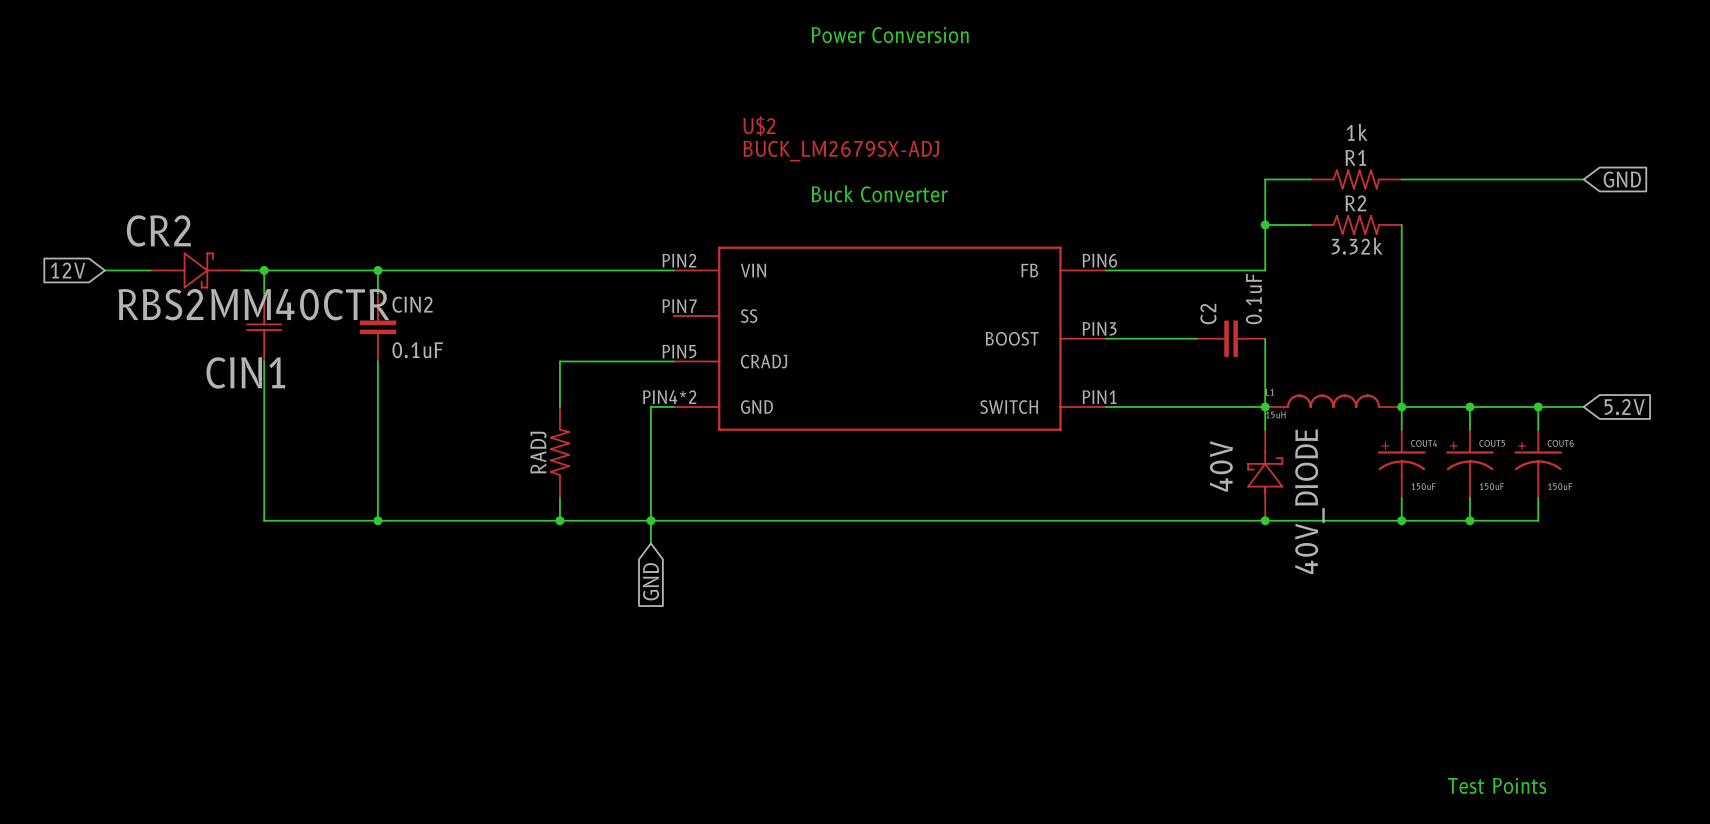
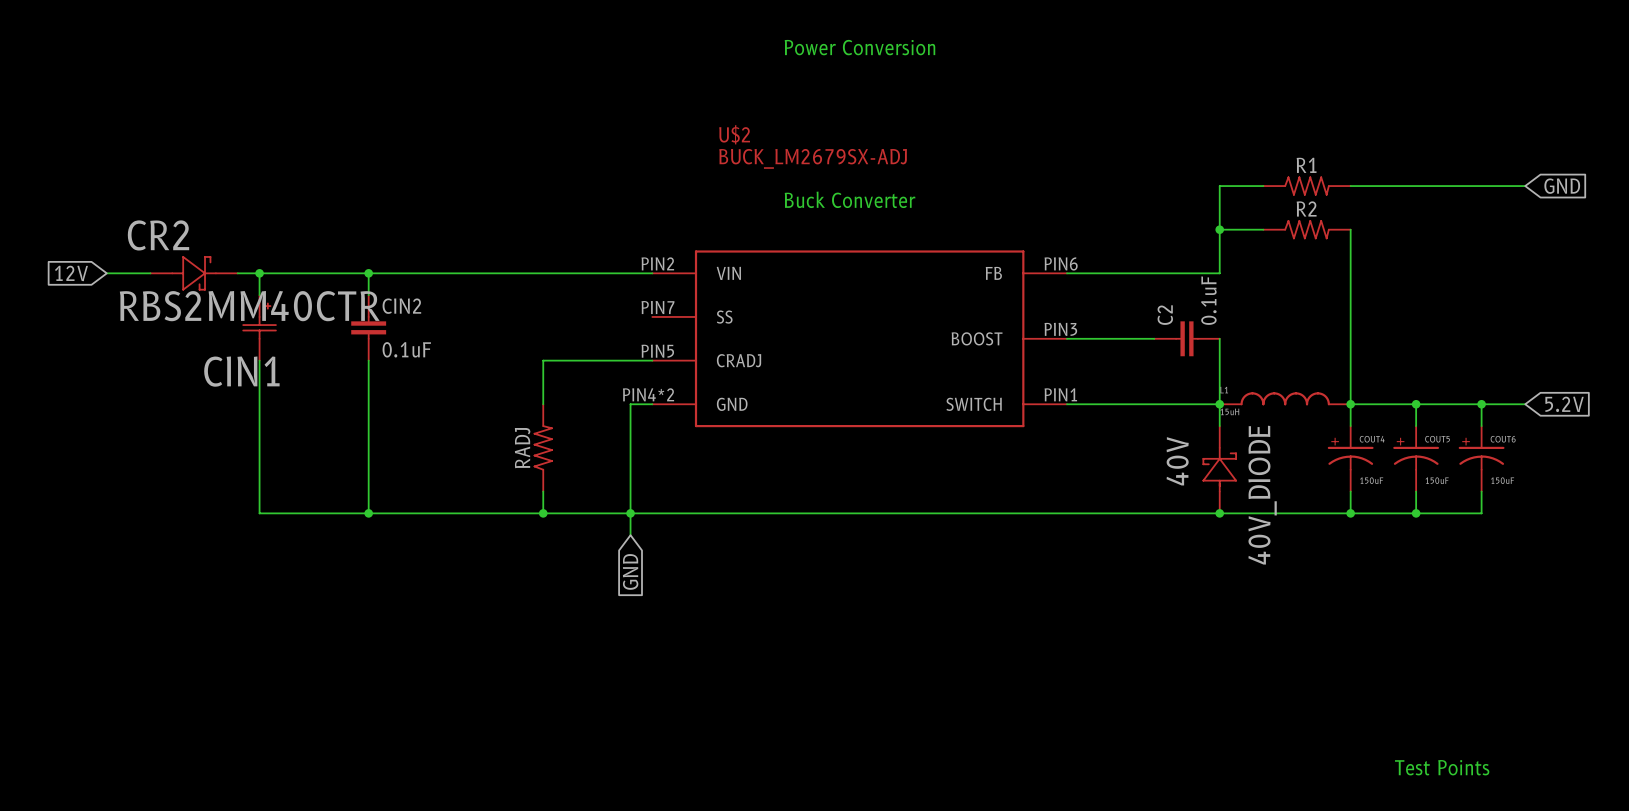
R1 value: 1k (1357, 132) -> none
R2 value: 3.32k (1357, 246) -> none
CIN1 symbol: [246, 293, 283, 362] -> [242, 295, 277, 361]

